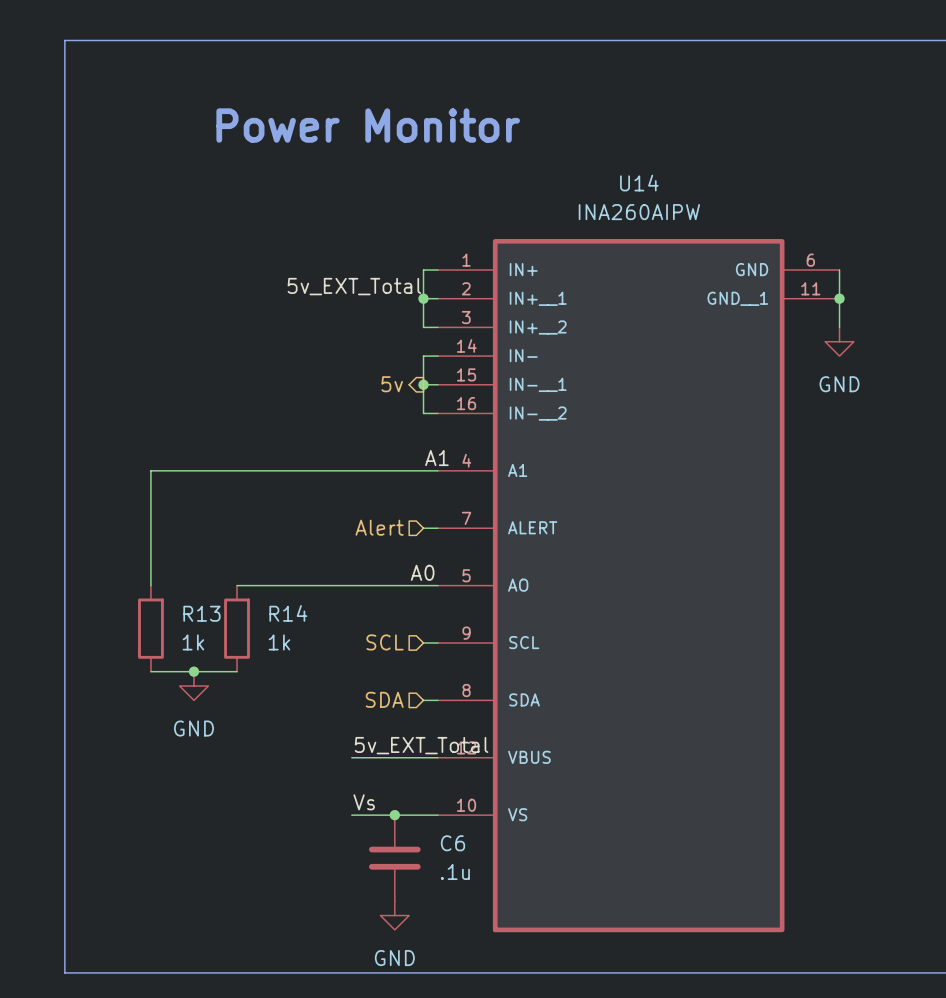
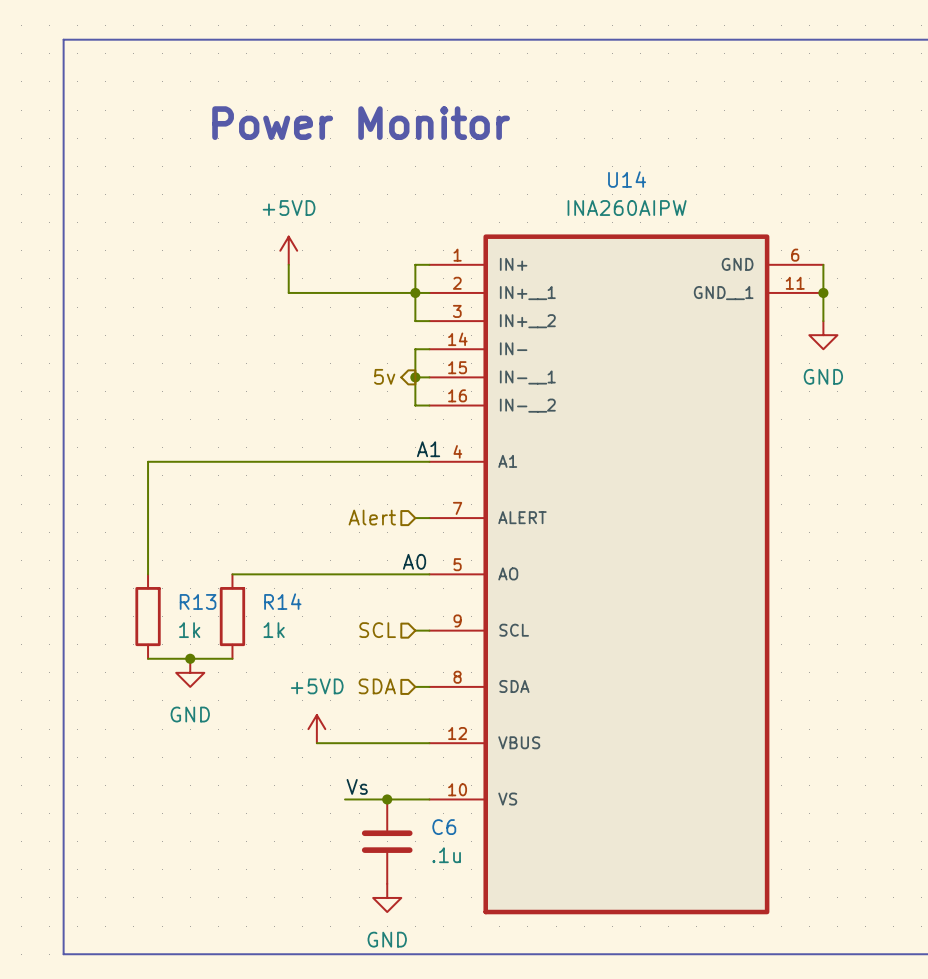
power symbol: none -> +5VD (288, 250)
wire: none -> (288, 264) (288, 292) (415, 292)
label: 5v_EXT_Total (354, 286) -> none
power symbol: none -> +5VD (316, 729)
label: 5v_EXT_Total (421, 745) -> none
wire: none -> (316, 743) (345, 743)

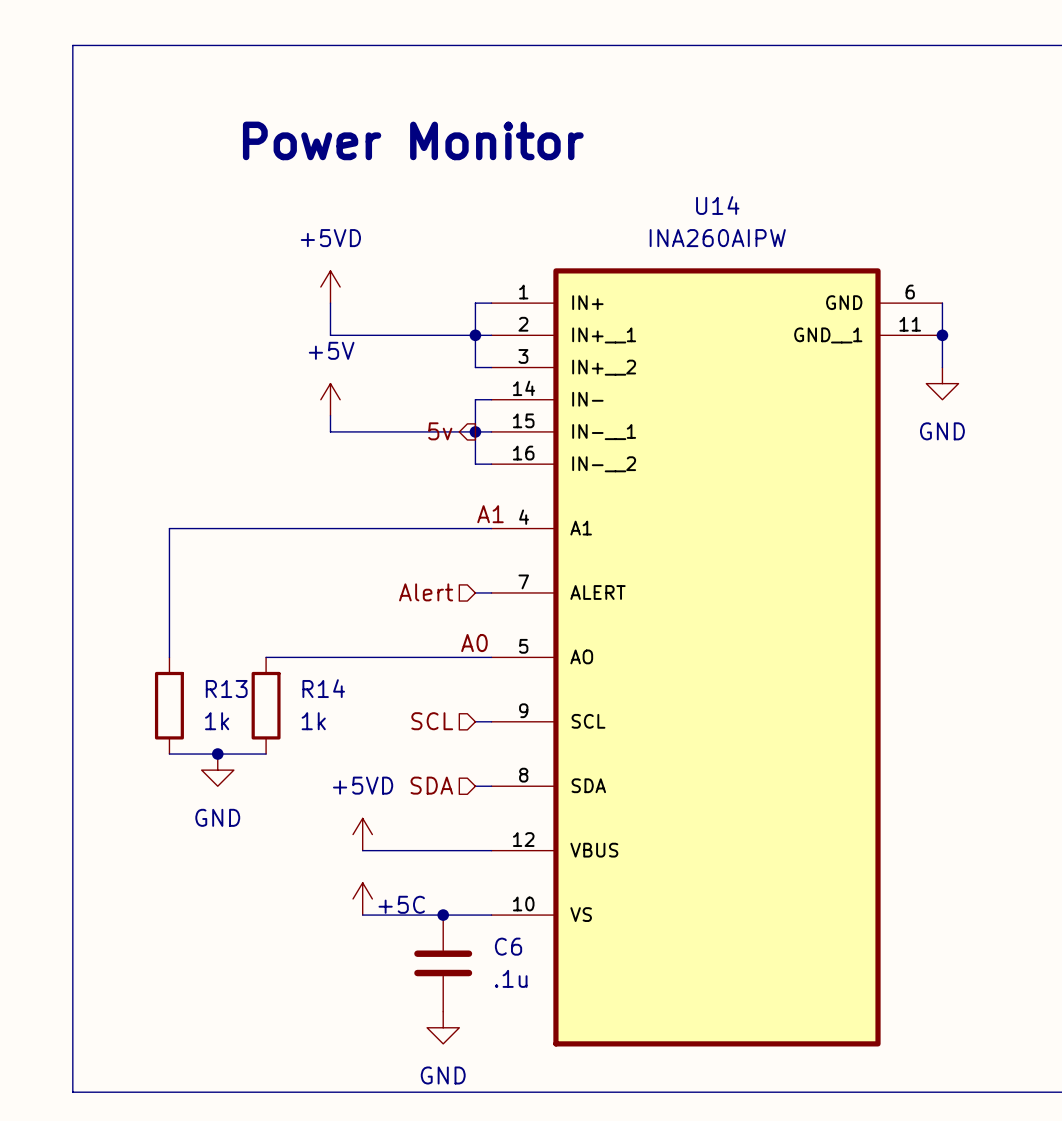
power symbol: none -> +5V (330, 399)
wire: none -> (330, 415) (330, 431) (475, 431)
power symbol: none -> +5C (362, 898)
label: Vs (357, 786) -> none
wire: none -> (362, 915) (394, 915)

